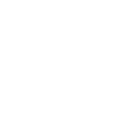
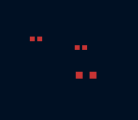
part: none -> (35, 38)
part: none -> (80, 47)
part: none -> (86, 75)

